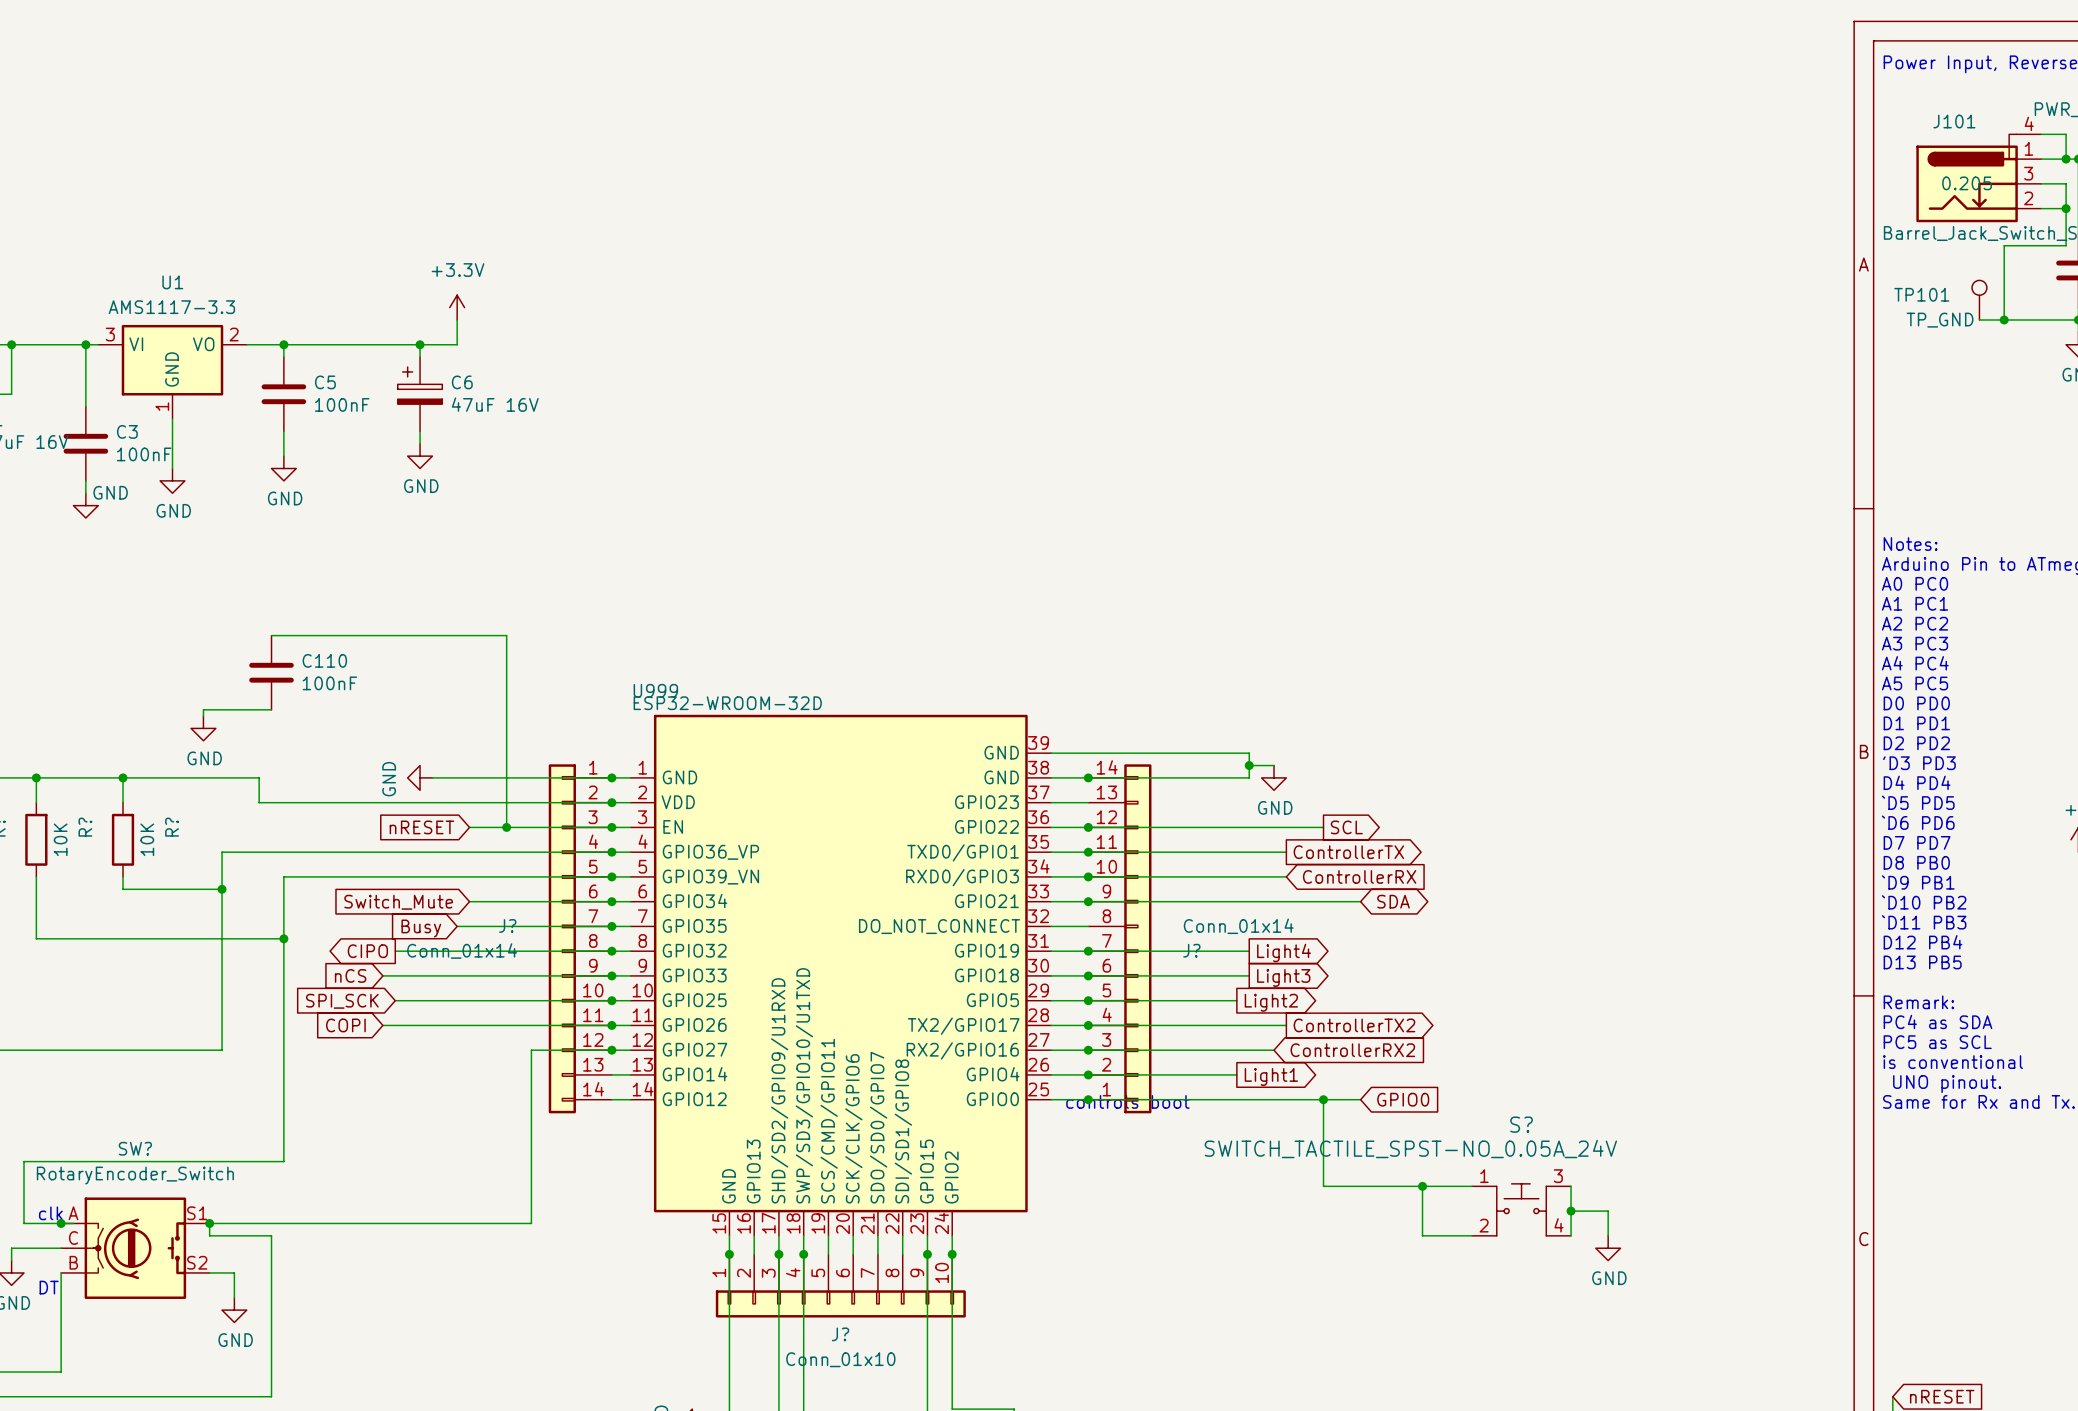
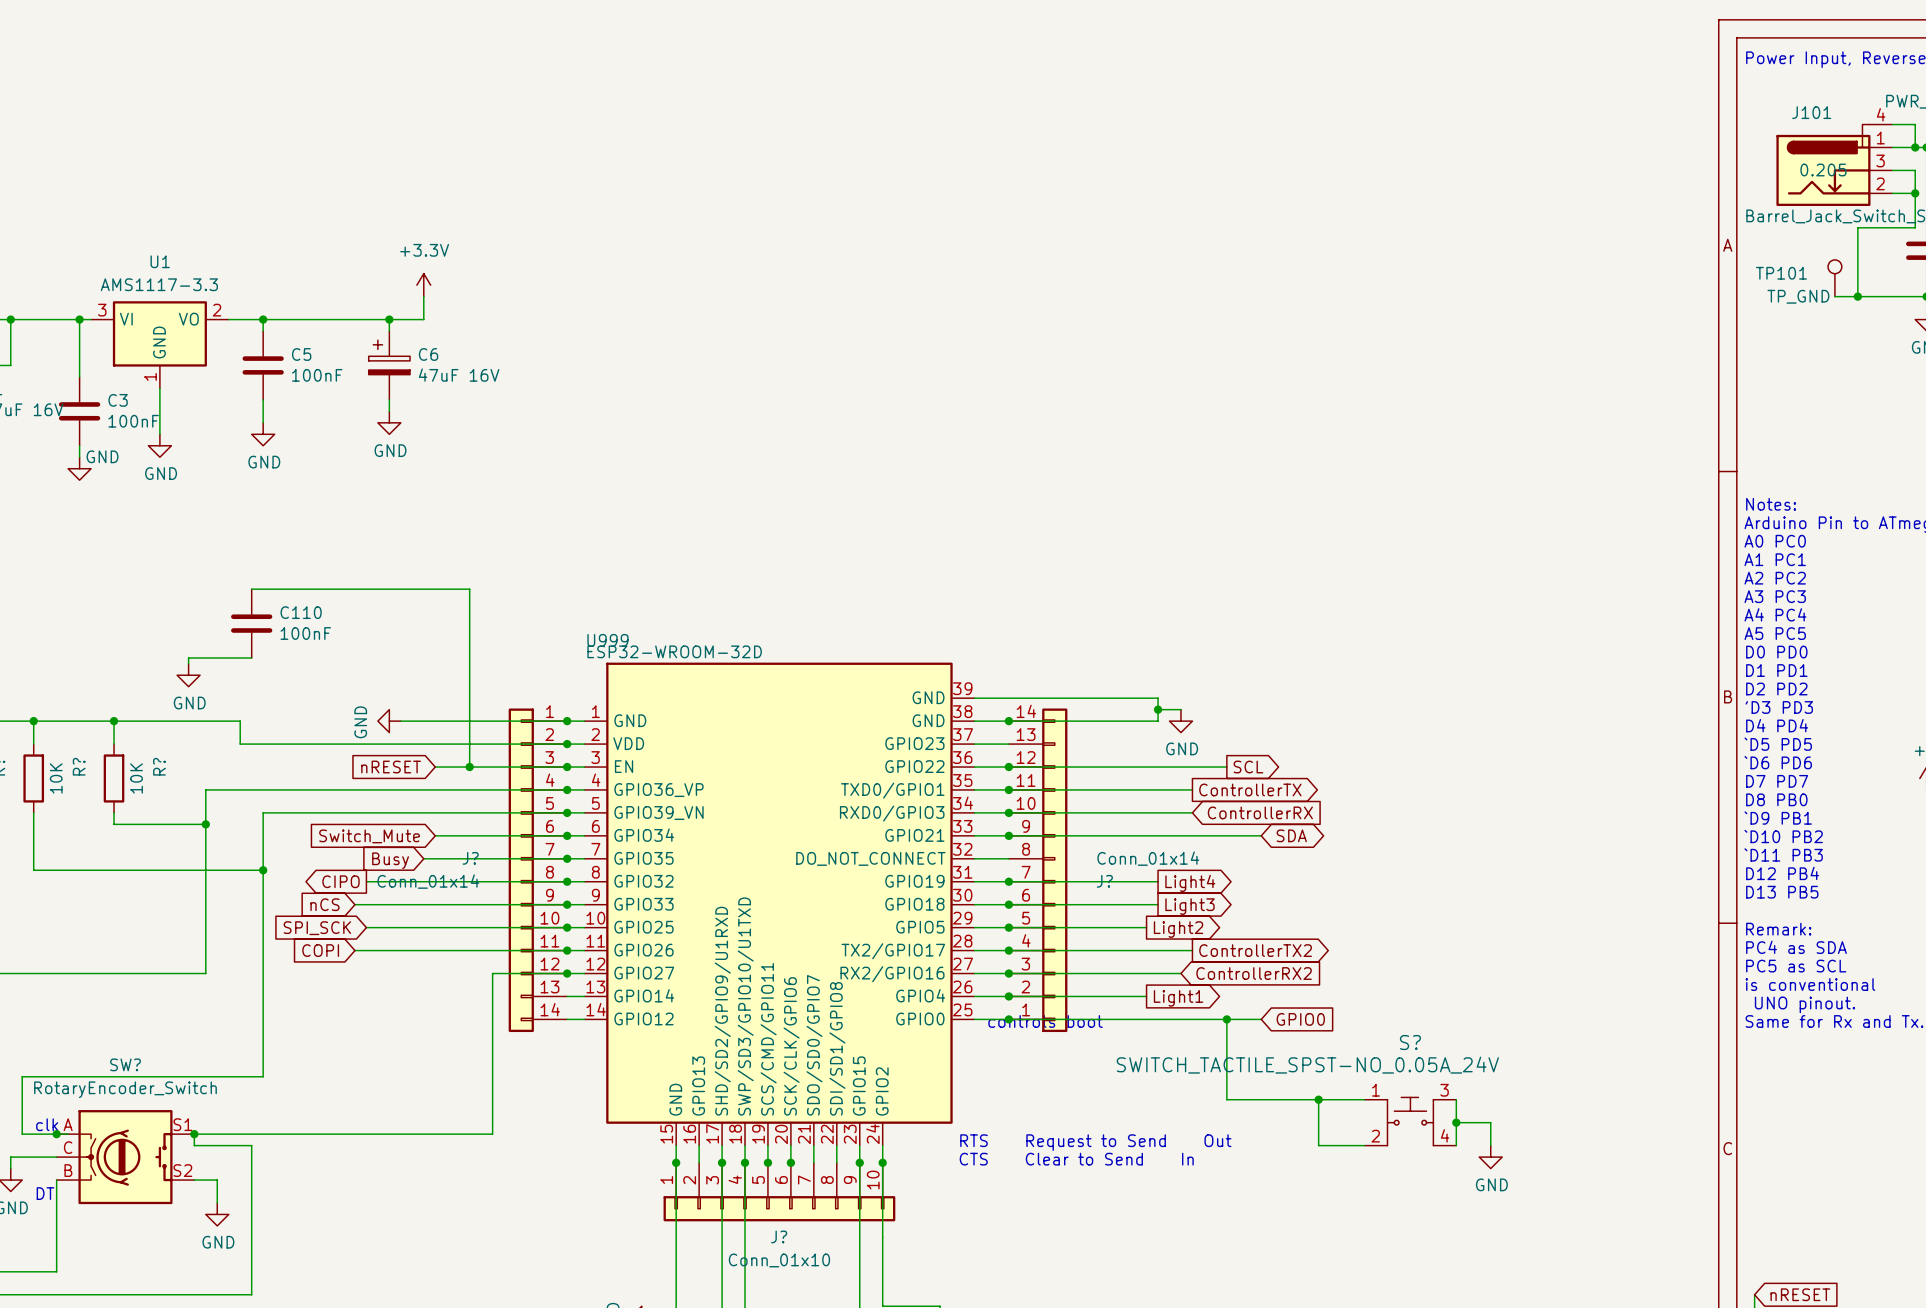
text: none -> RTS Request to Send Out (1095, 1142)
text: none -> CTS Clear to Send In (1076, 1159)
junction: none -> (767, 1162)
junction: none -> (790, 1162)

